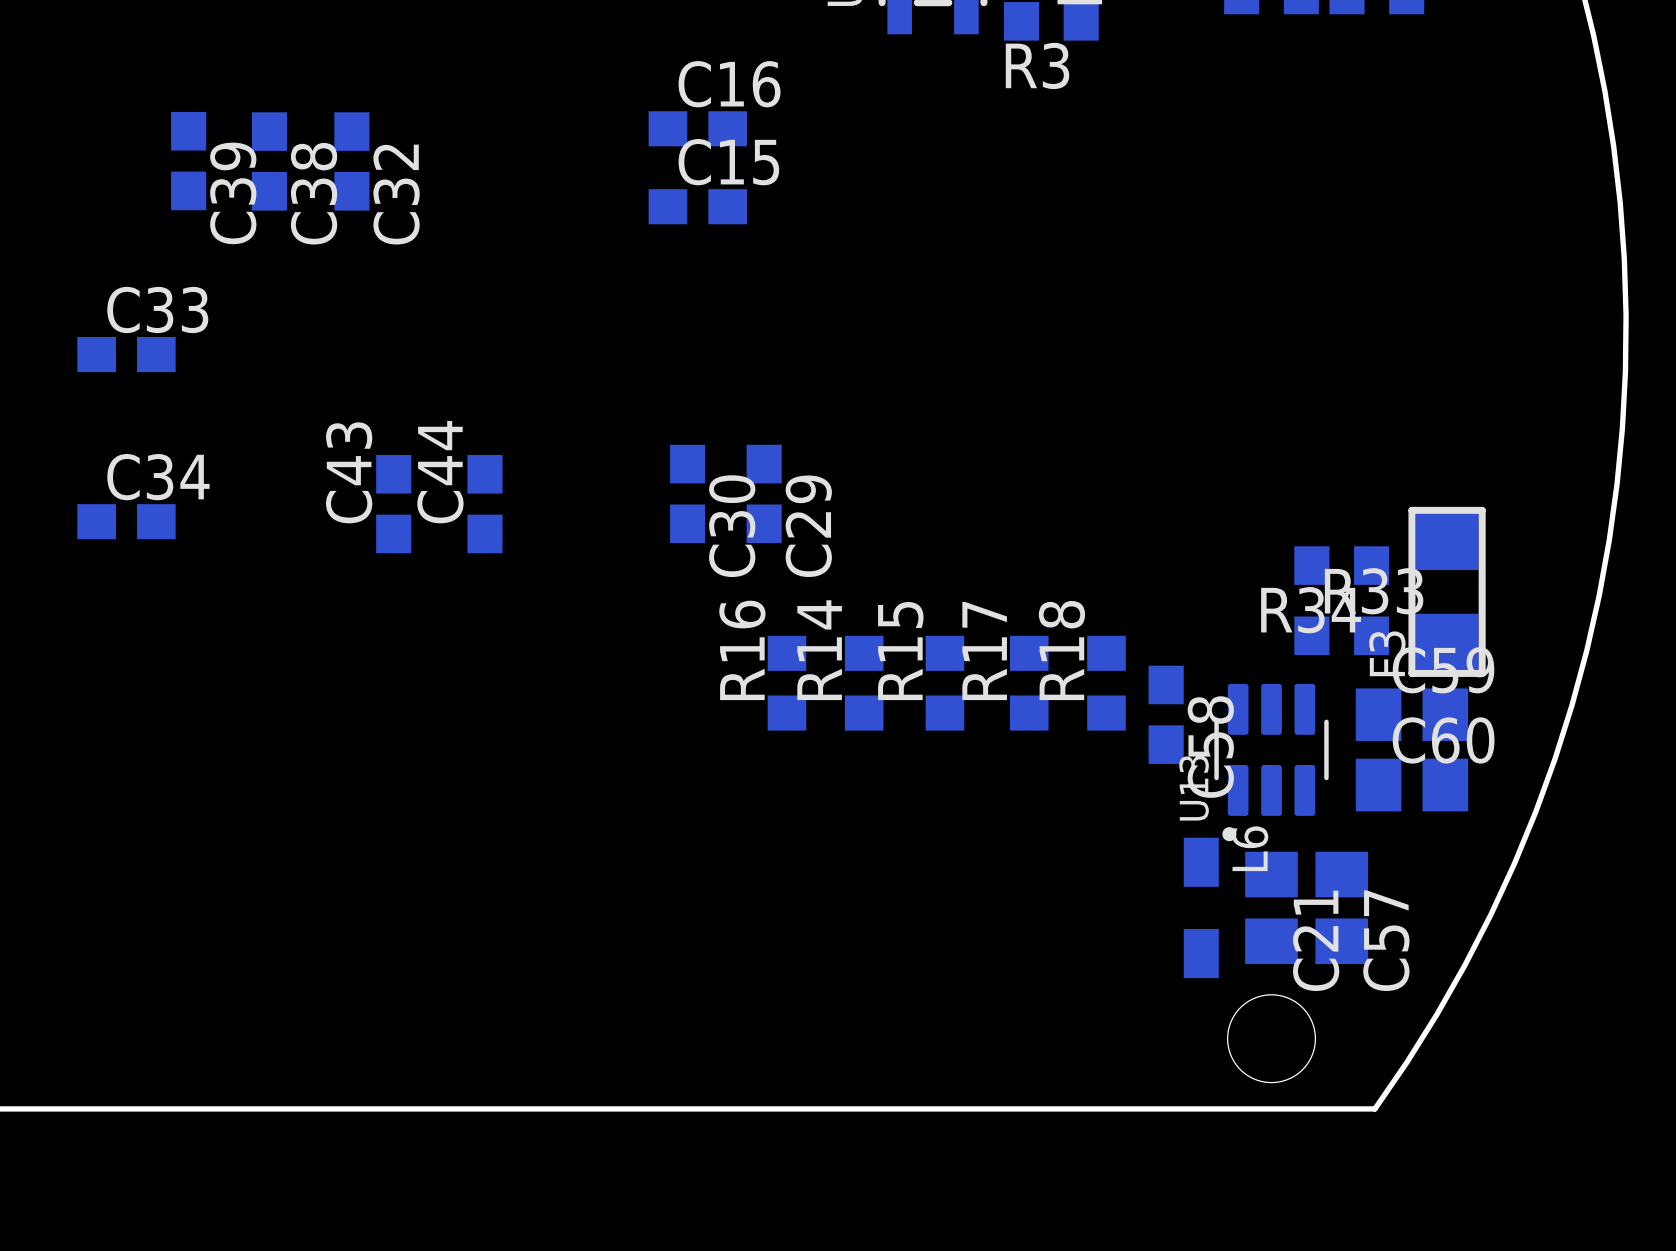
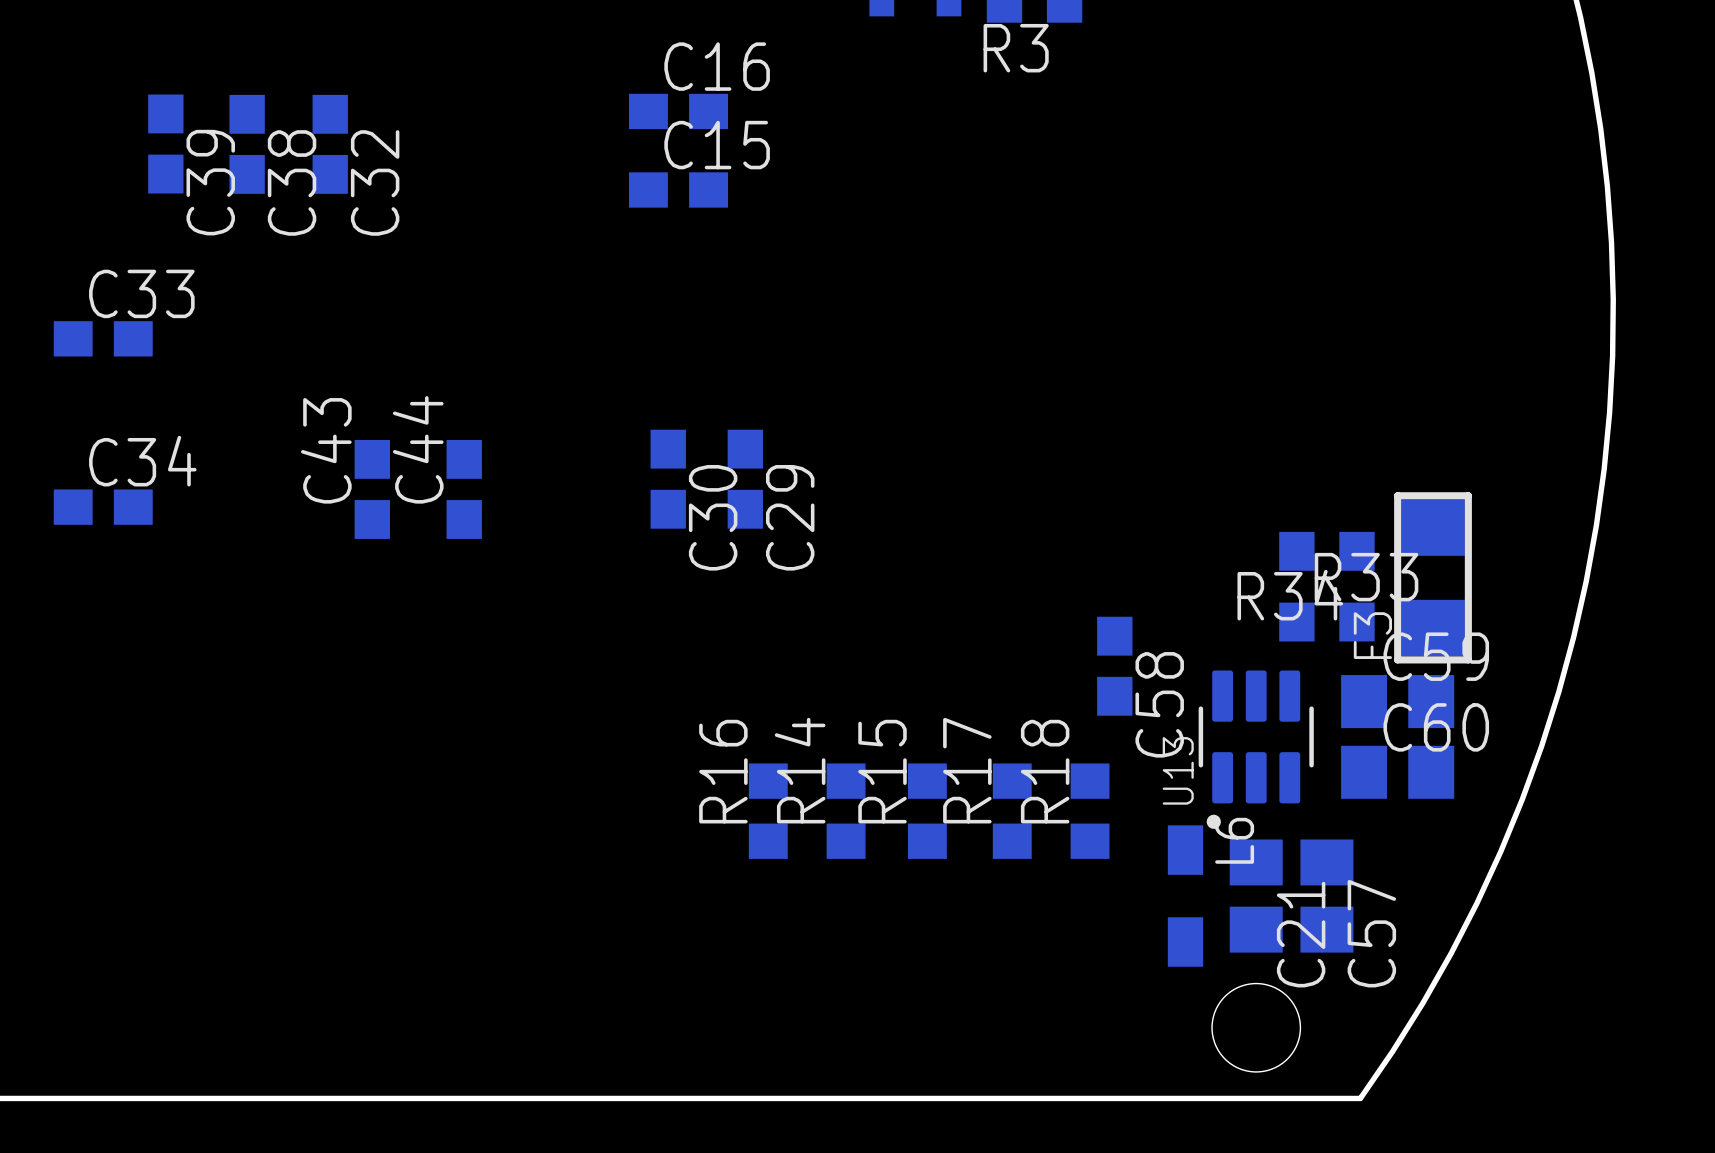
R16 position: (786, 683) -> (768, 811)
R14 position: (864, 683) -> (846, 811)
R15 position: (944, 683) -> (927, 811)
R17 position: (1029, 683) -> (1012, 811)
R18 position: (1106, 683) -> (1090, 811)
C58 position: (1166, 714) -> (1114, 666)

